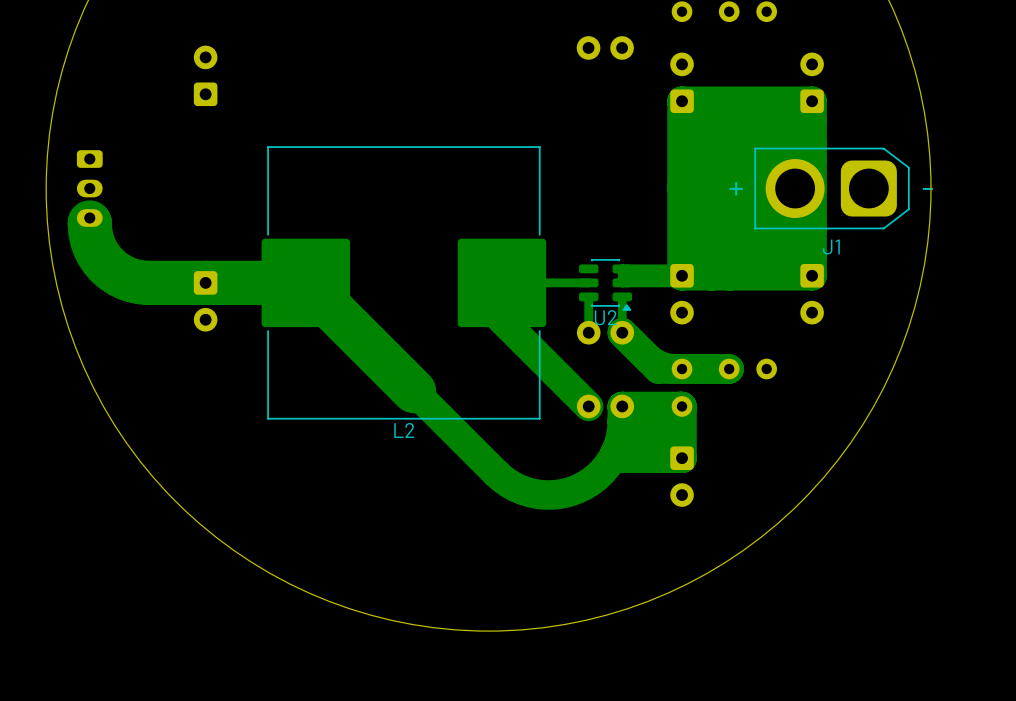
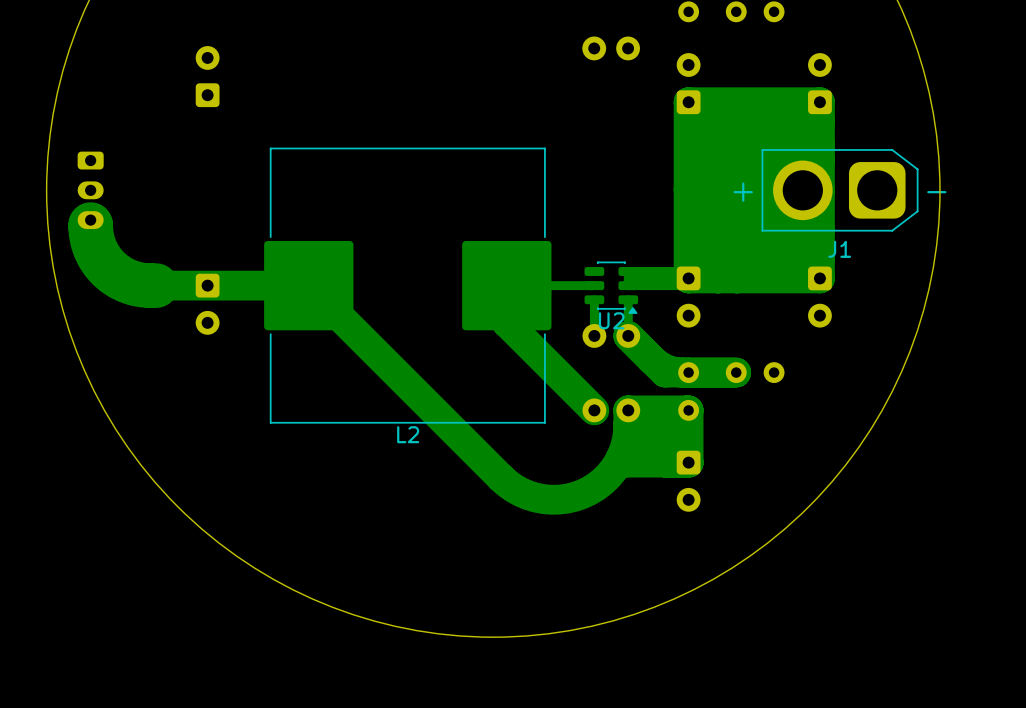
track width: thick (154, 282) (305, 282) (414, 391) -> thin (156, 285) (308, 285) (418, 394)

